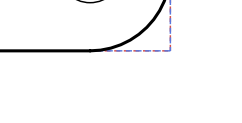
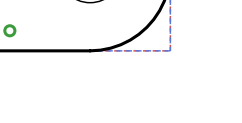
via: none -> (9, 30)

